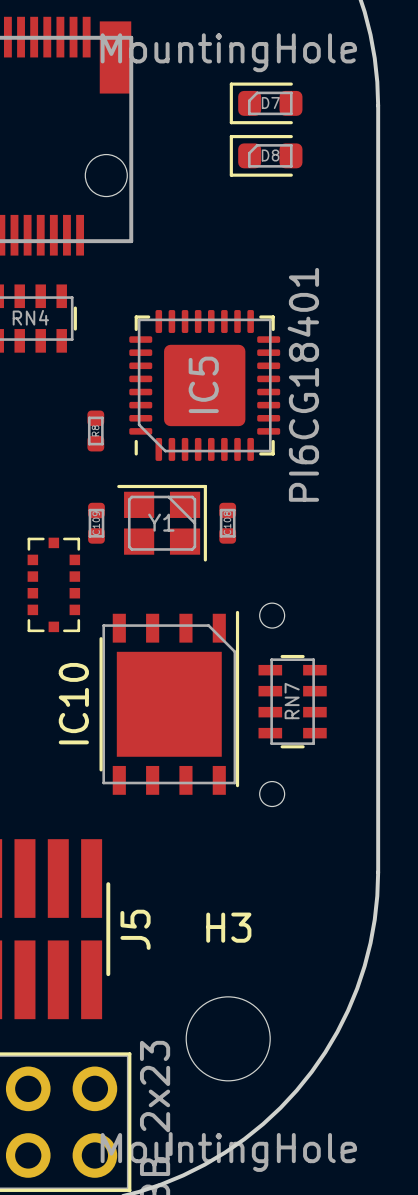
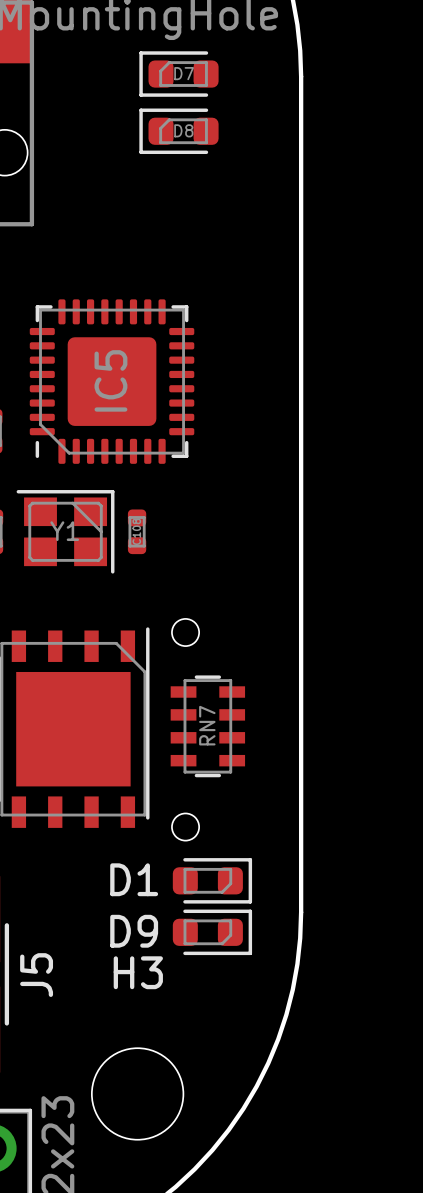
IC5 value: PI6CG18401 (303, 384) -> none
D1: none -> (212, 880)
D9: none -> (212, 932)

